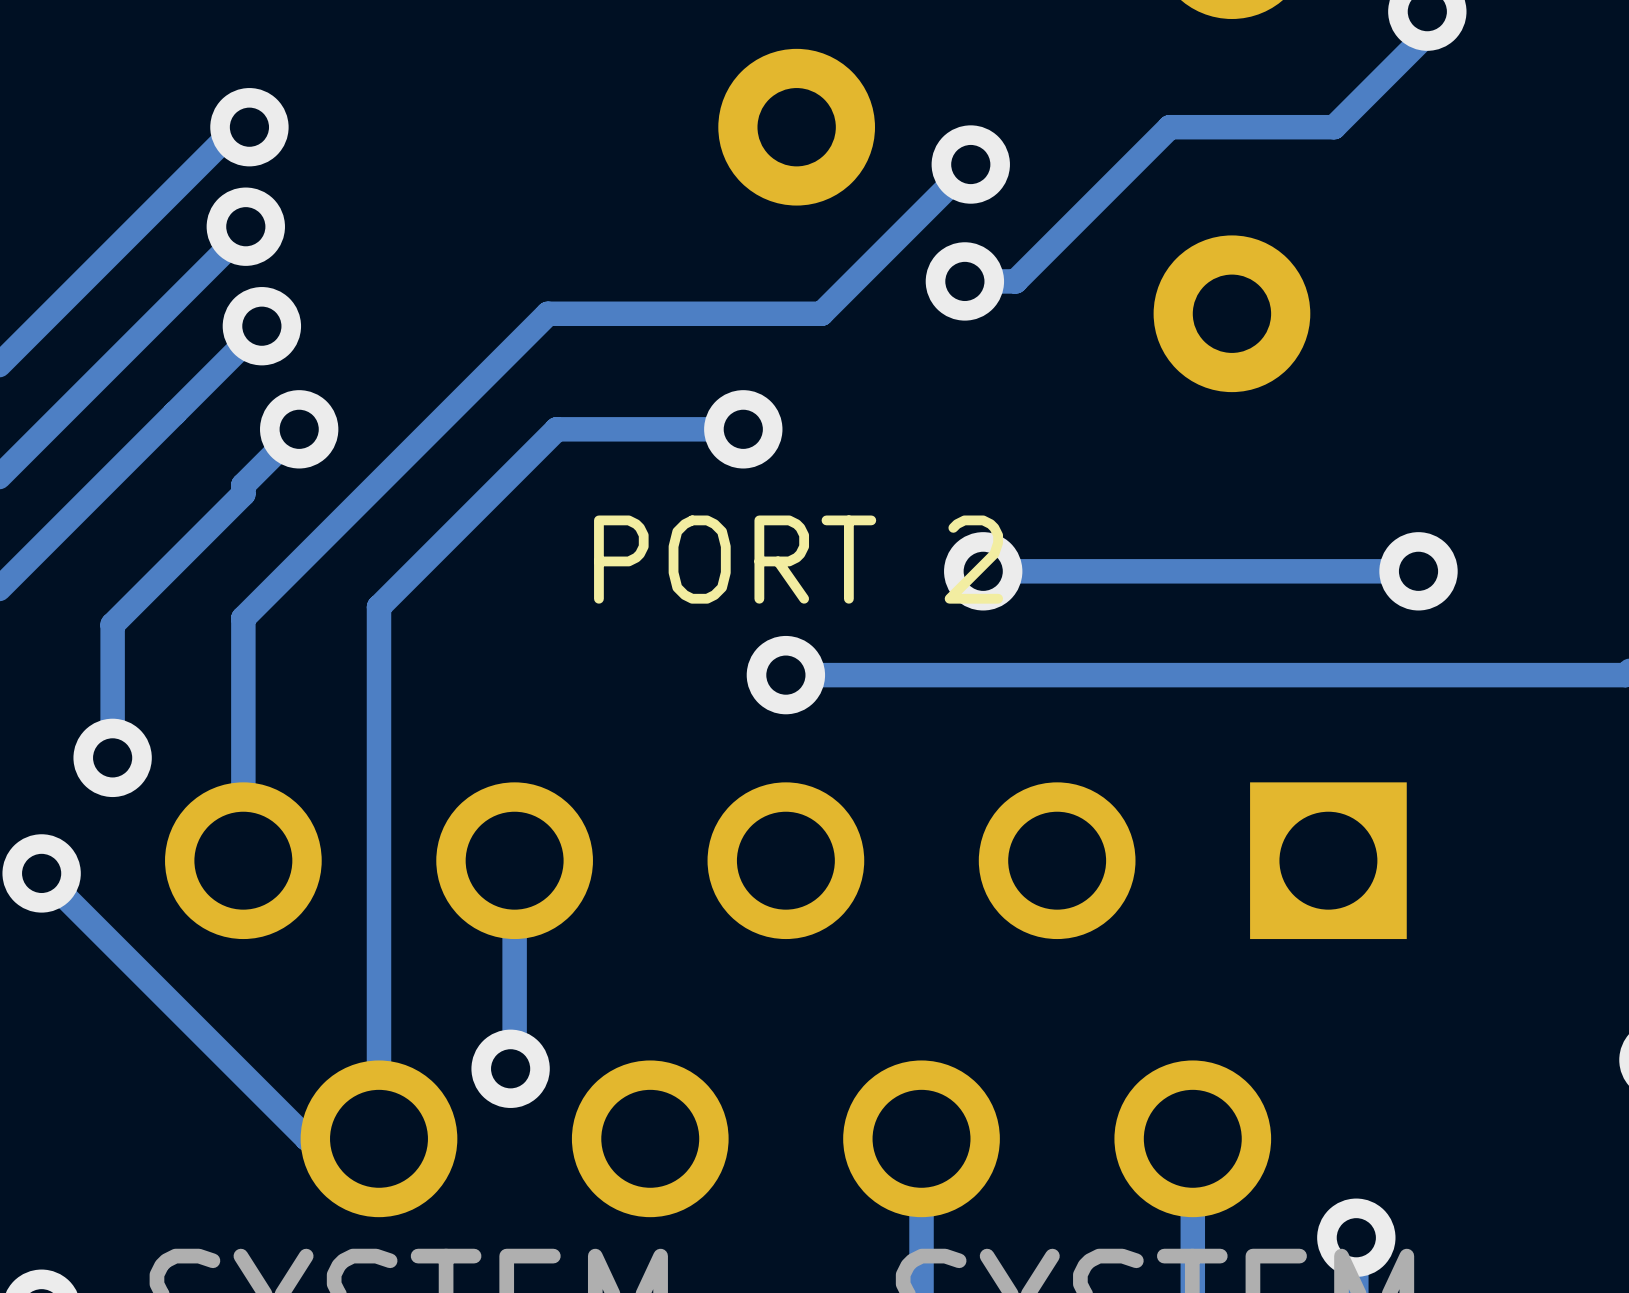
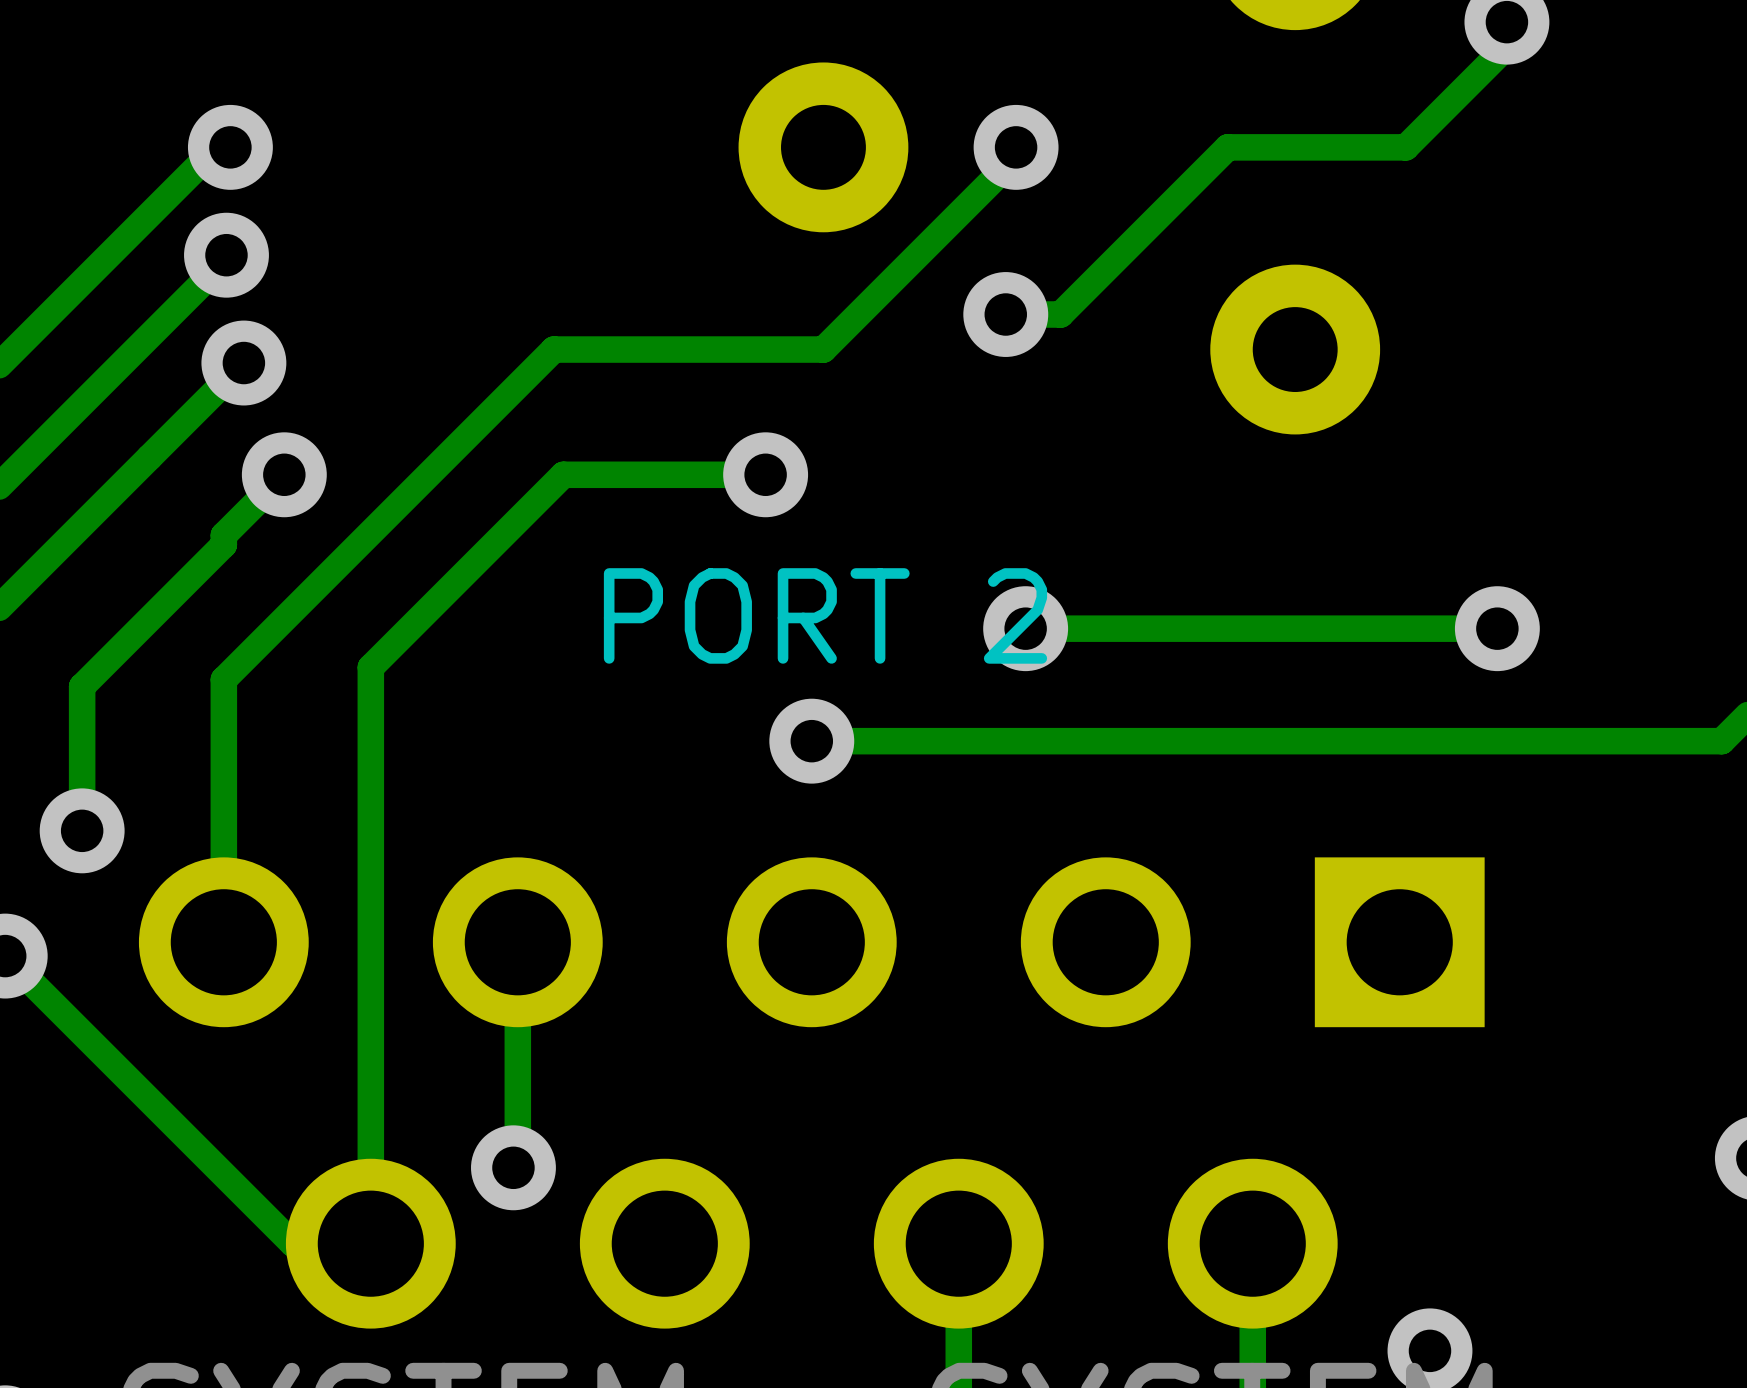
track: (970, 164) (821, 313) (796, 313) -> (1016, 147) (1016, 156) (823, 349)
via position: (970, 164) -> (1016, 147)

